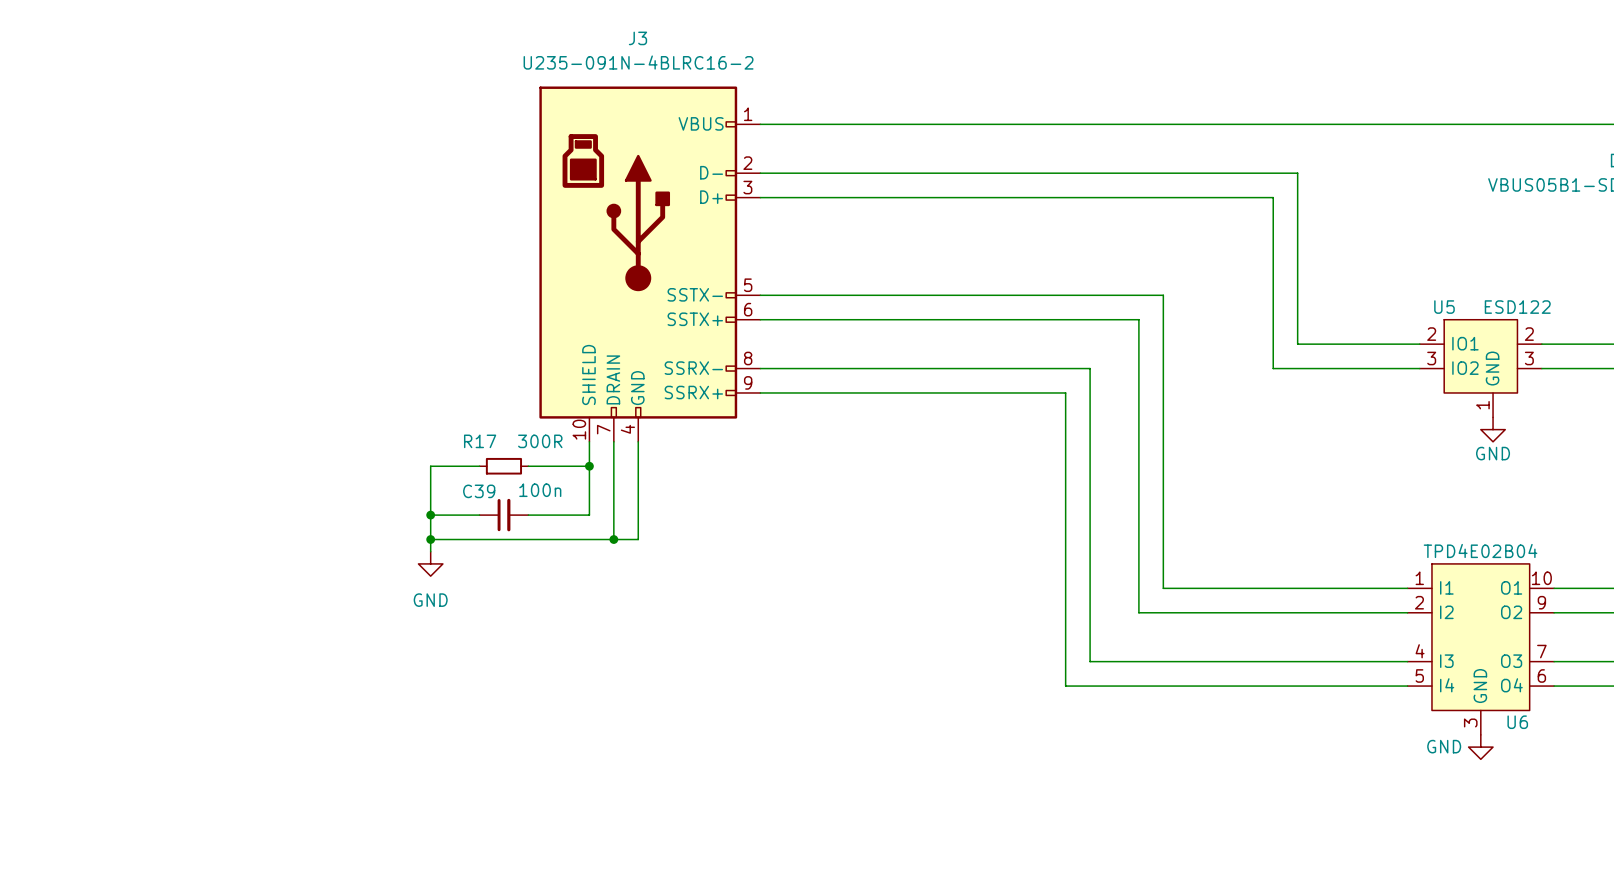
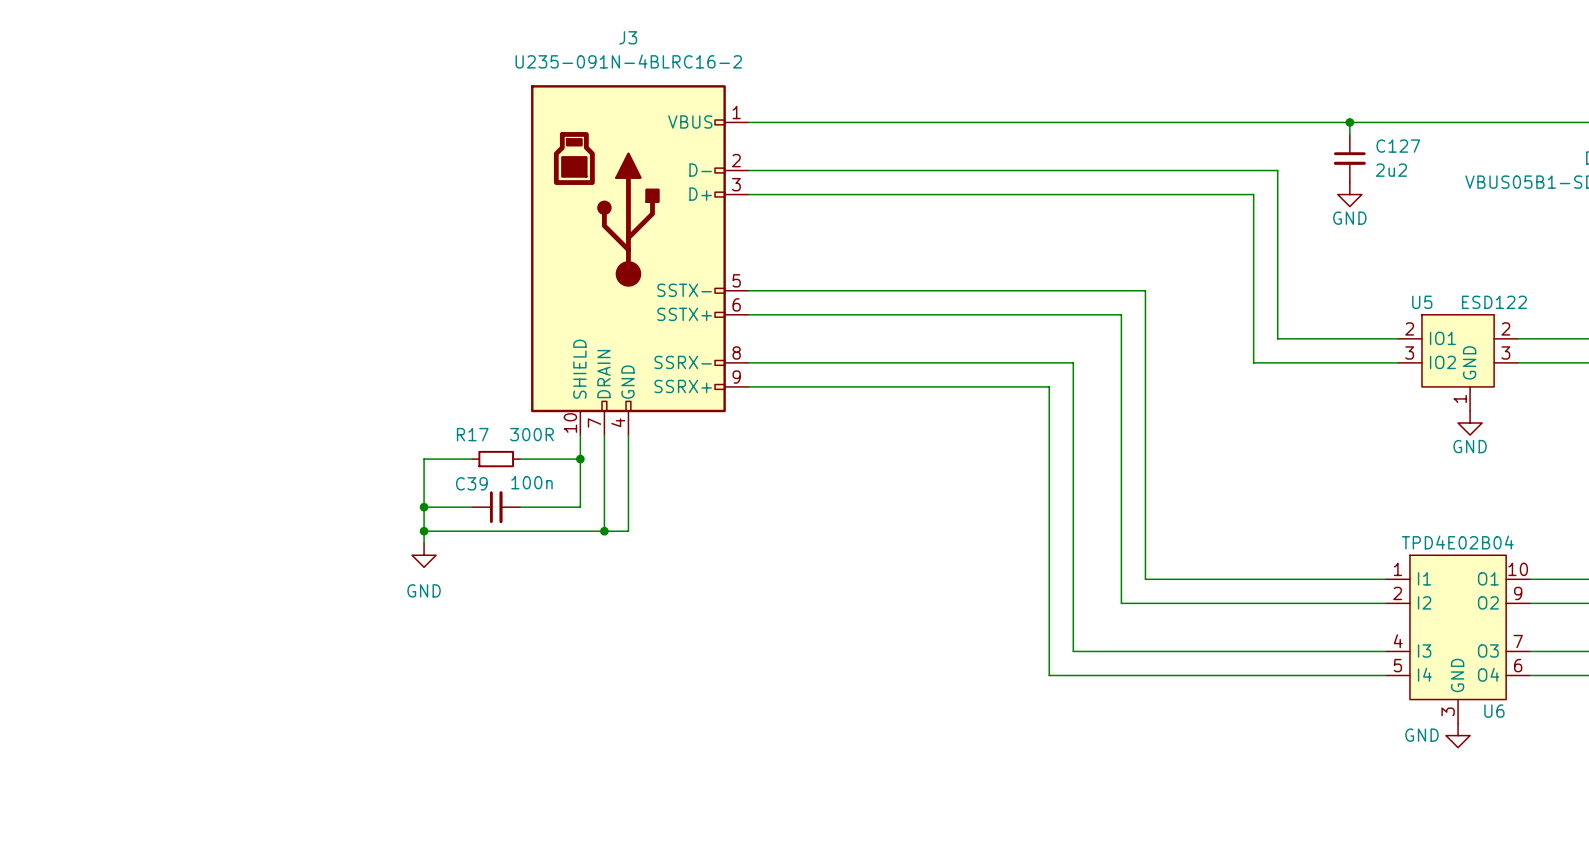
wire: none -> (1349, 122) (1349, 134)
junction: none -> (1349, 122)
C127: none -> 2u2 (1349, 158)
power symbol: none -> GND (1349, 194)

